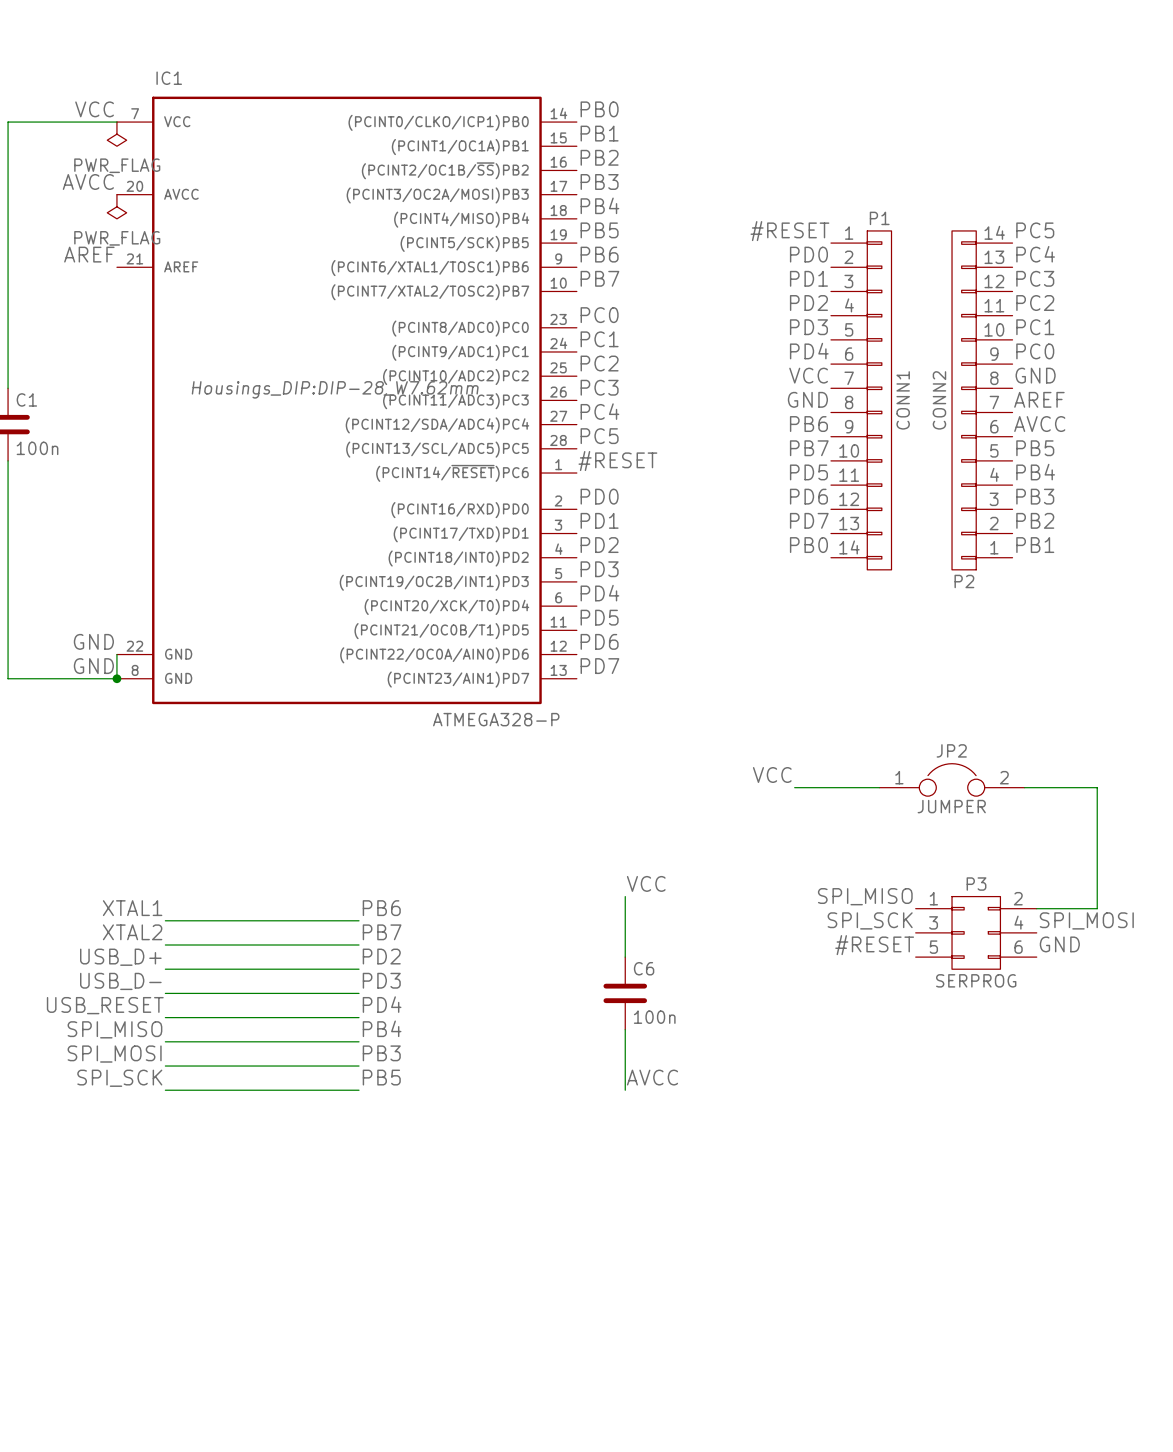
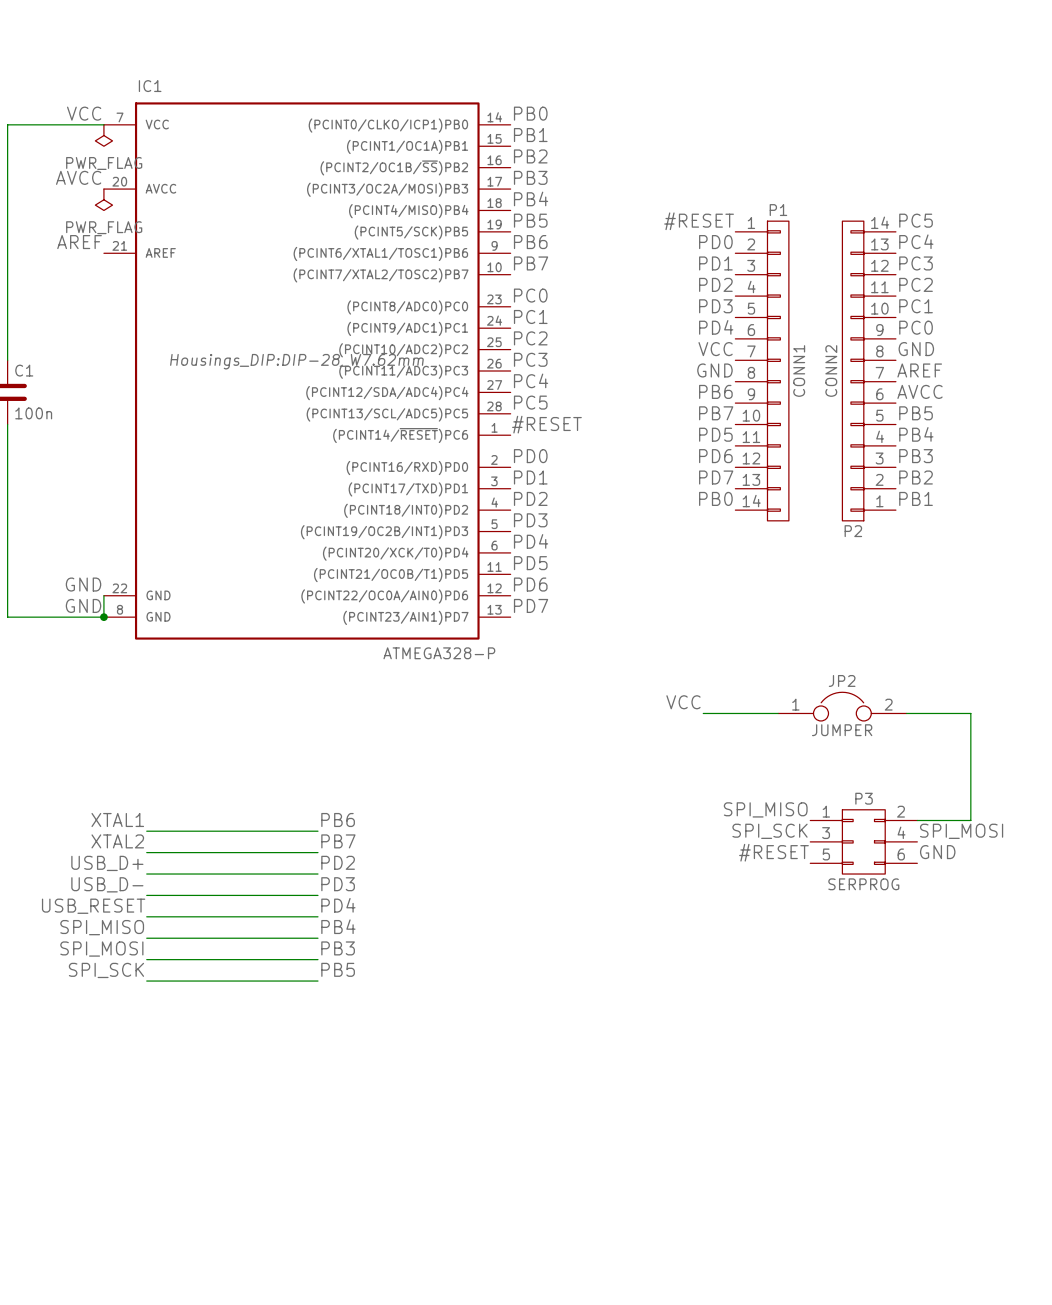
label: VCC (646, 883) -> none
wire: (625, 896) (625, 957) -> none
C6: 100n (625, 993) -> none
wire: (625, 1029) (625, 1090) -> none
label: AVCC (652, 1077) -> none

